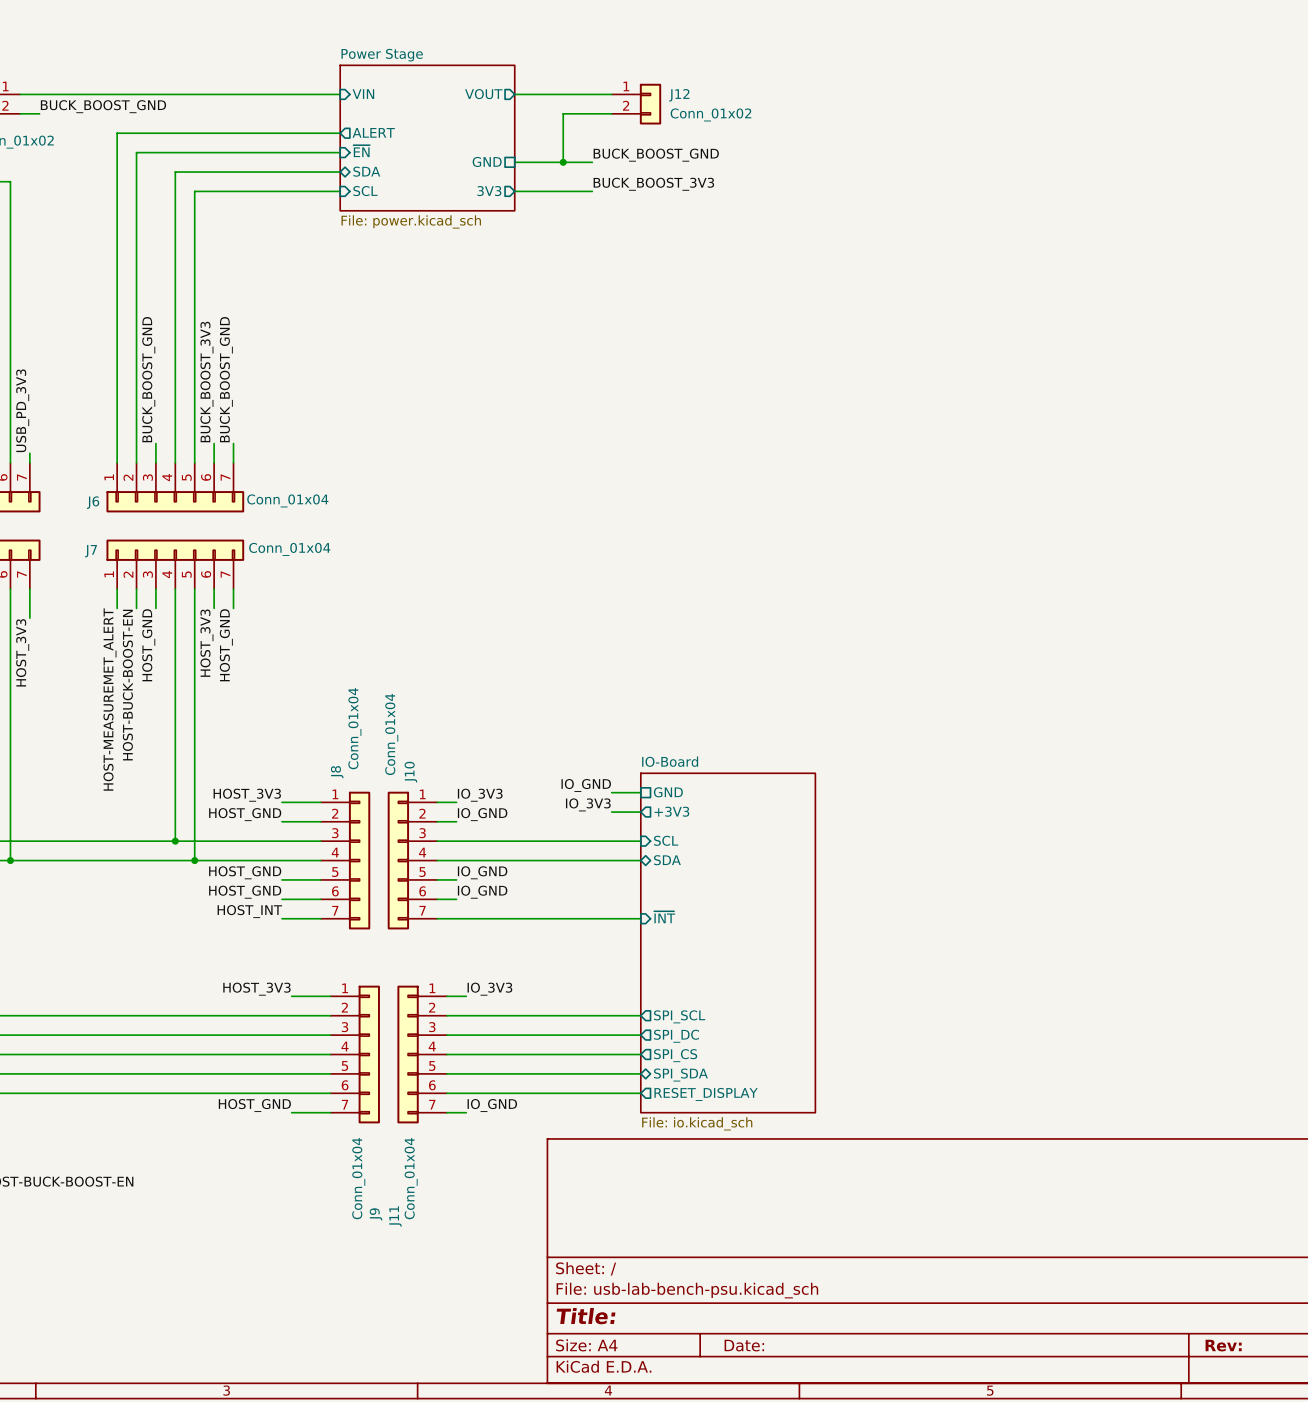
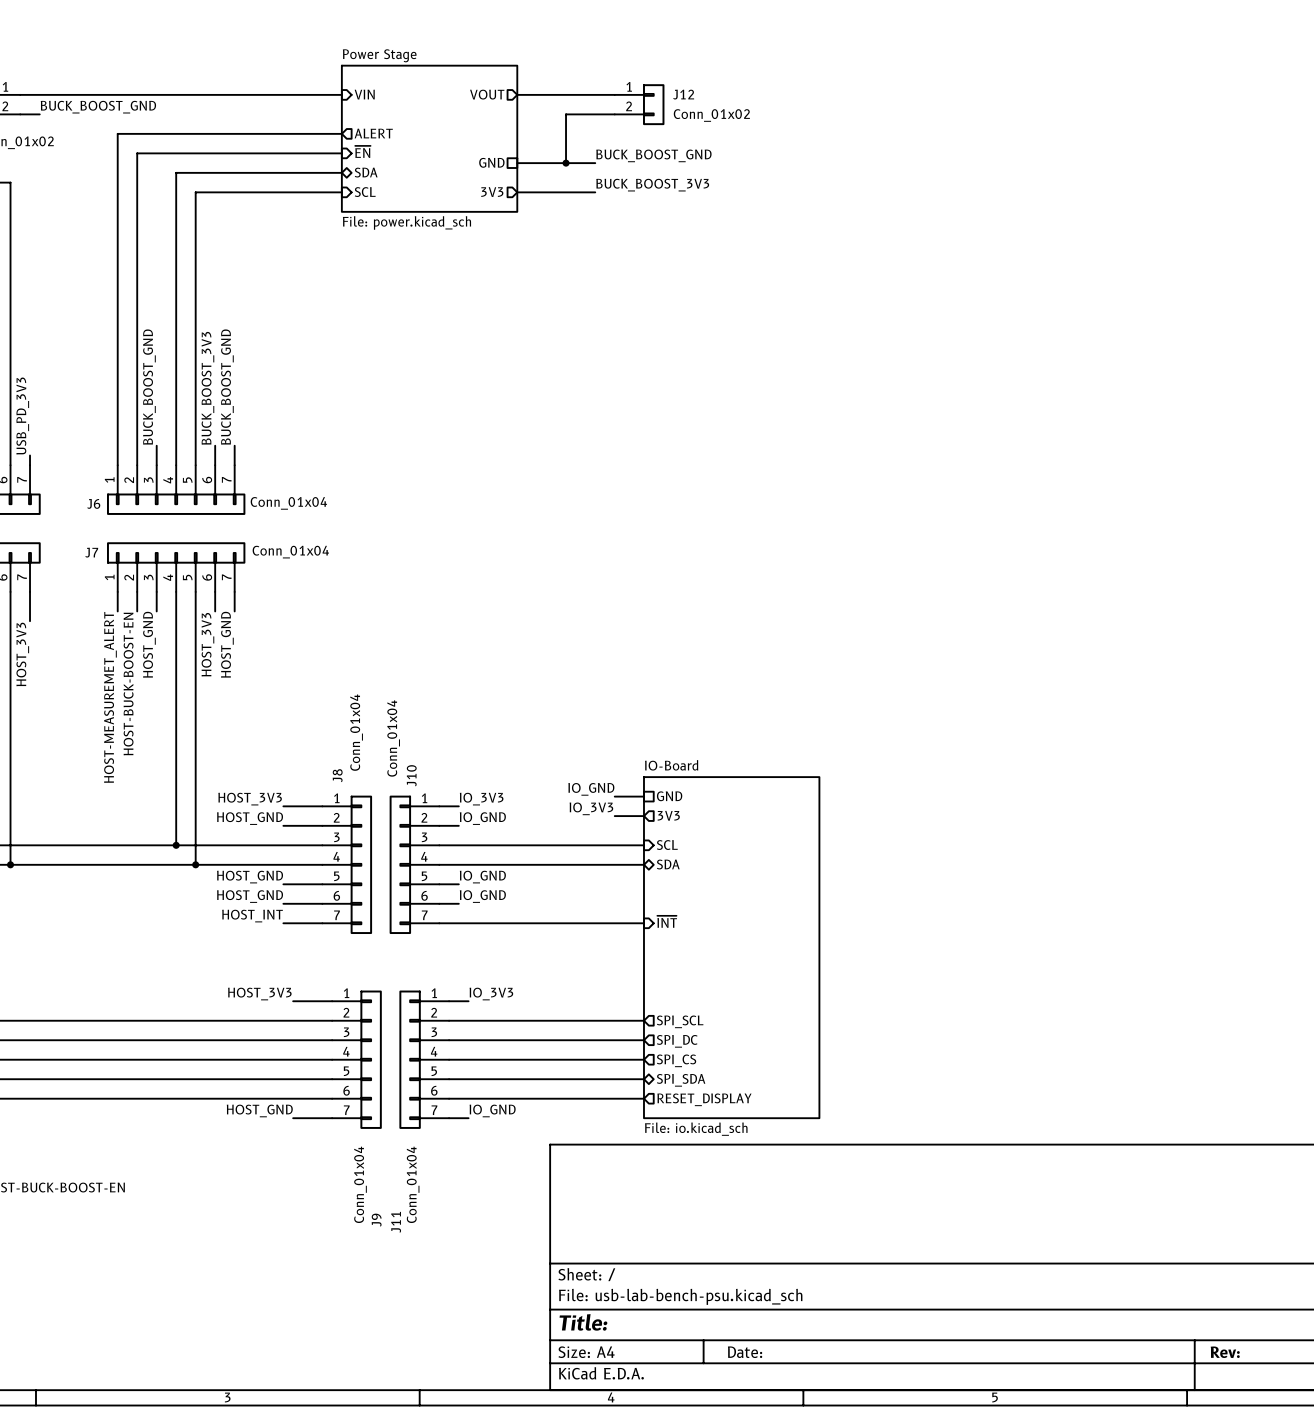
sheet pin: +3V3 (671, 811) -> 3V3 (668, 815)

